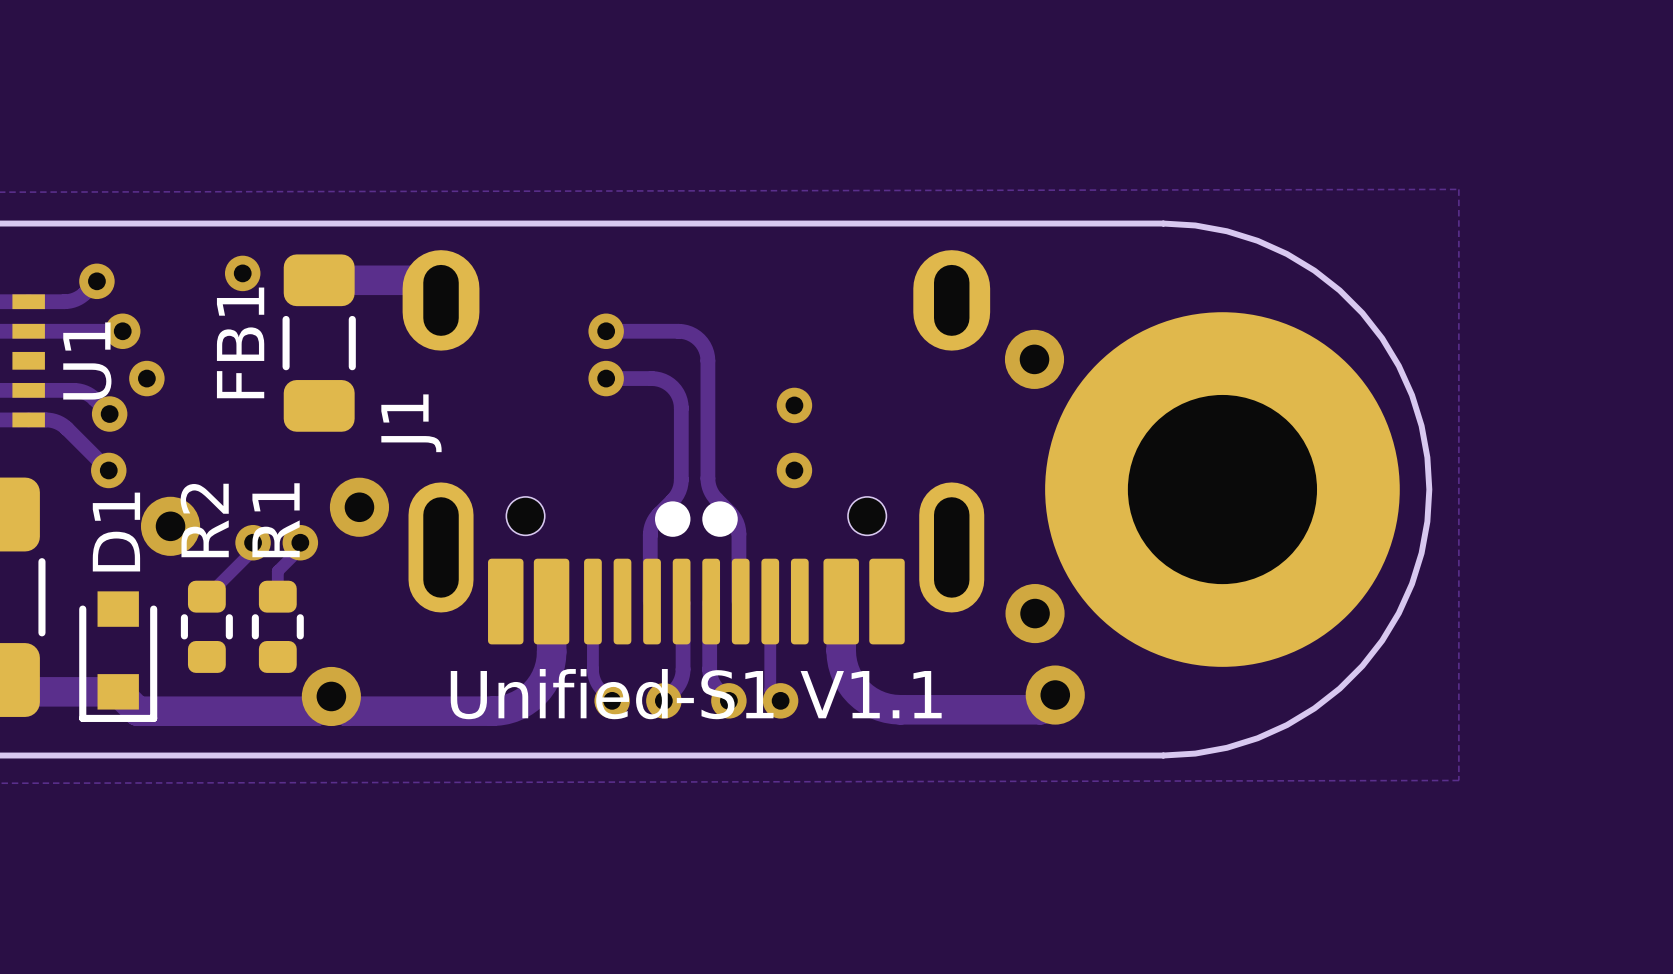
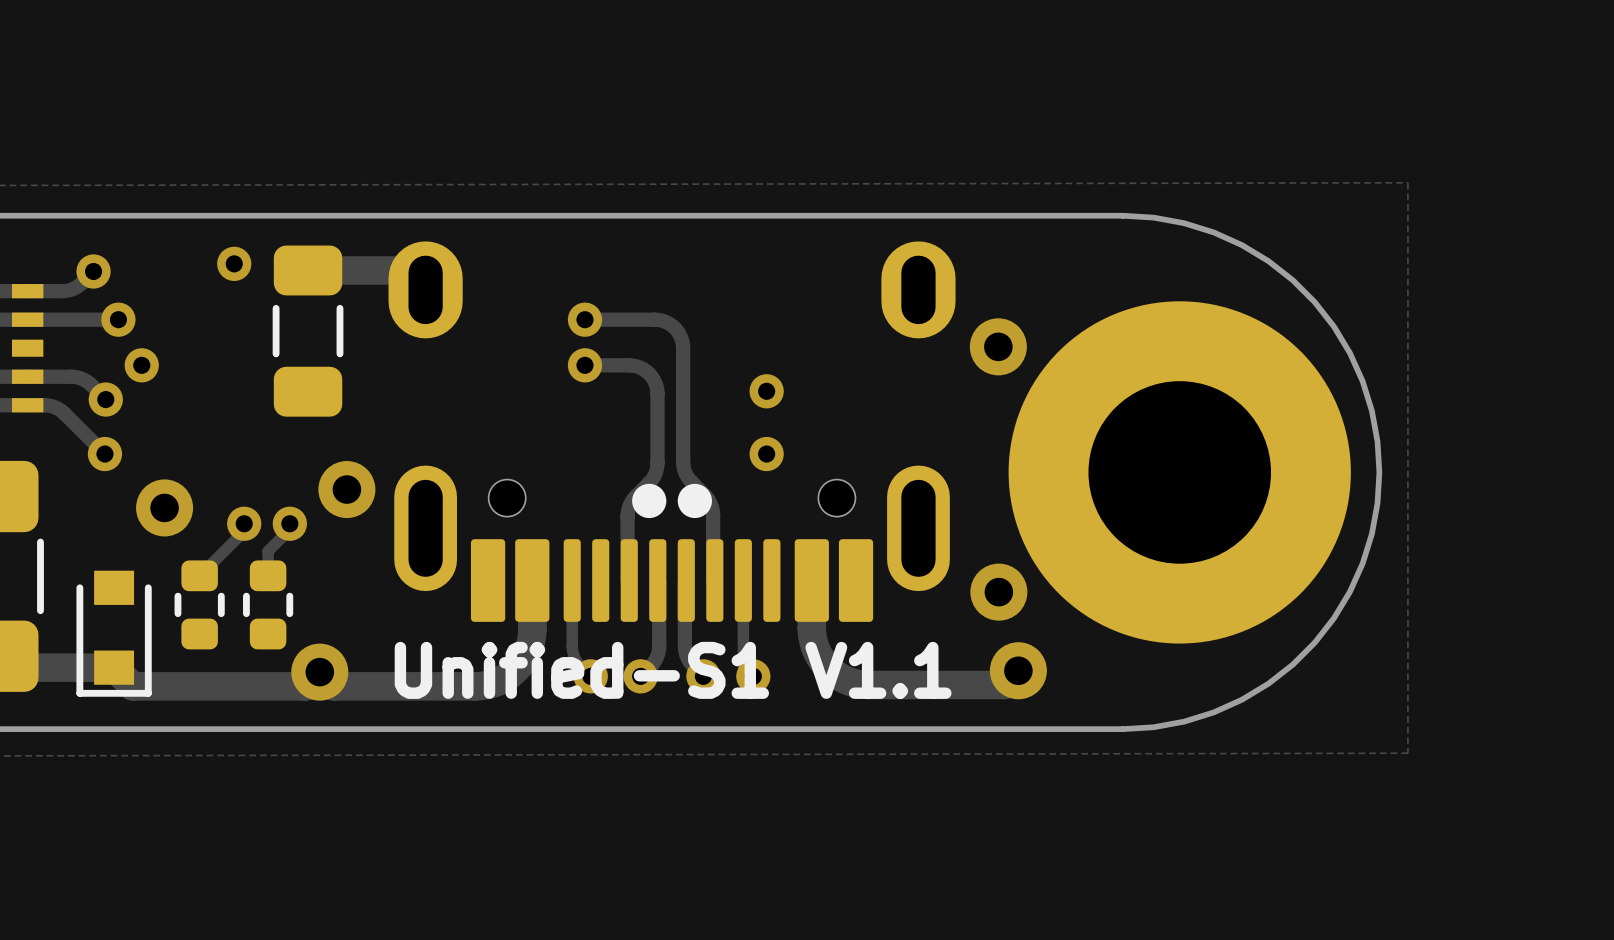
FB1 name: FB1 (240, 342) -> none
U1 name: U1 (87, 361) -> none
J1 name: J1 (411, 423) -> none
R2 name: R2 (204, 520) -> none
R1 name: R1 (276, 520) -> none
D1 name: D1 (116, 532) -> none

